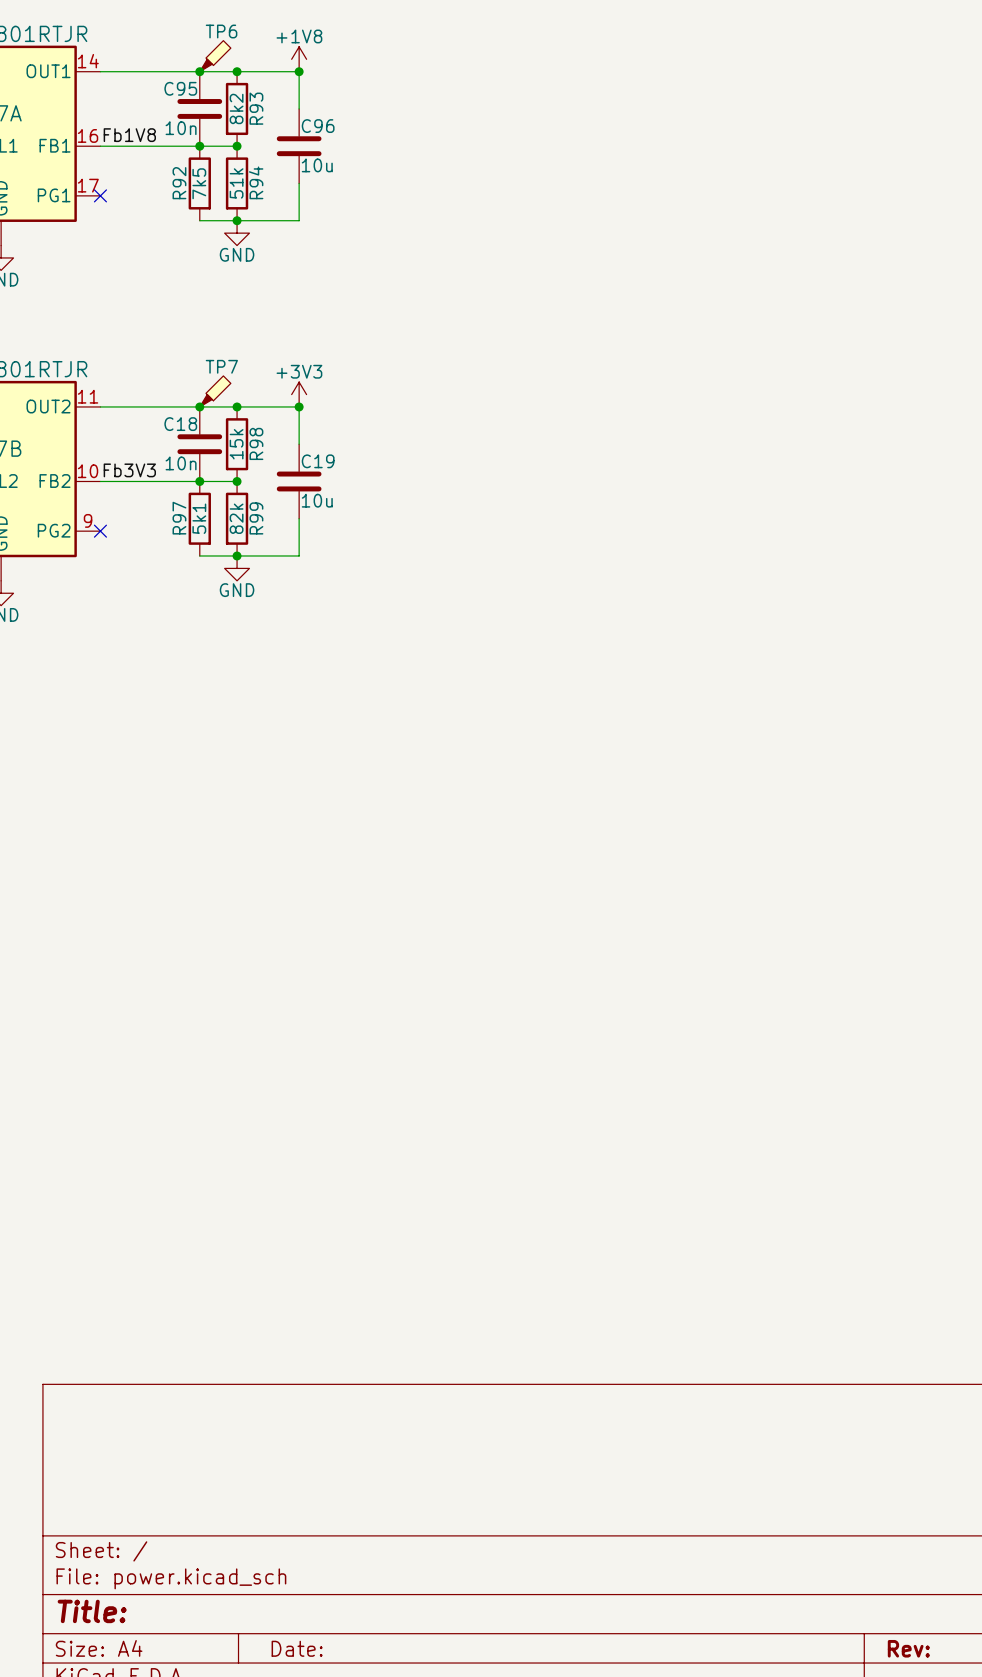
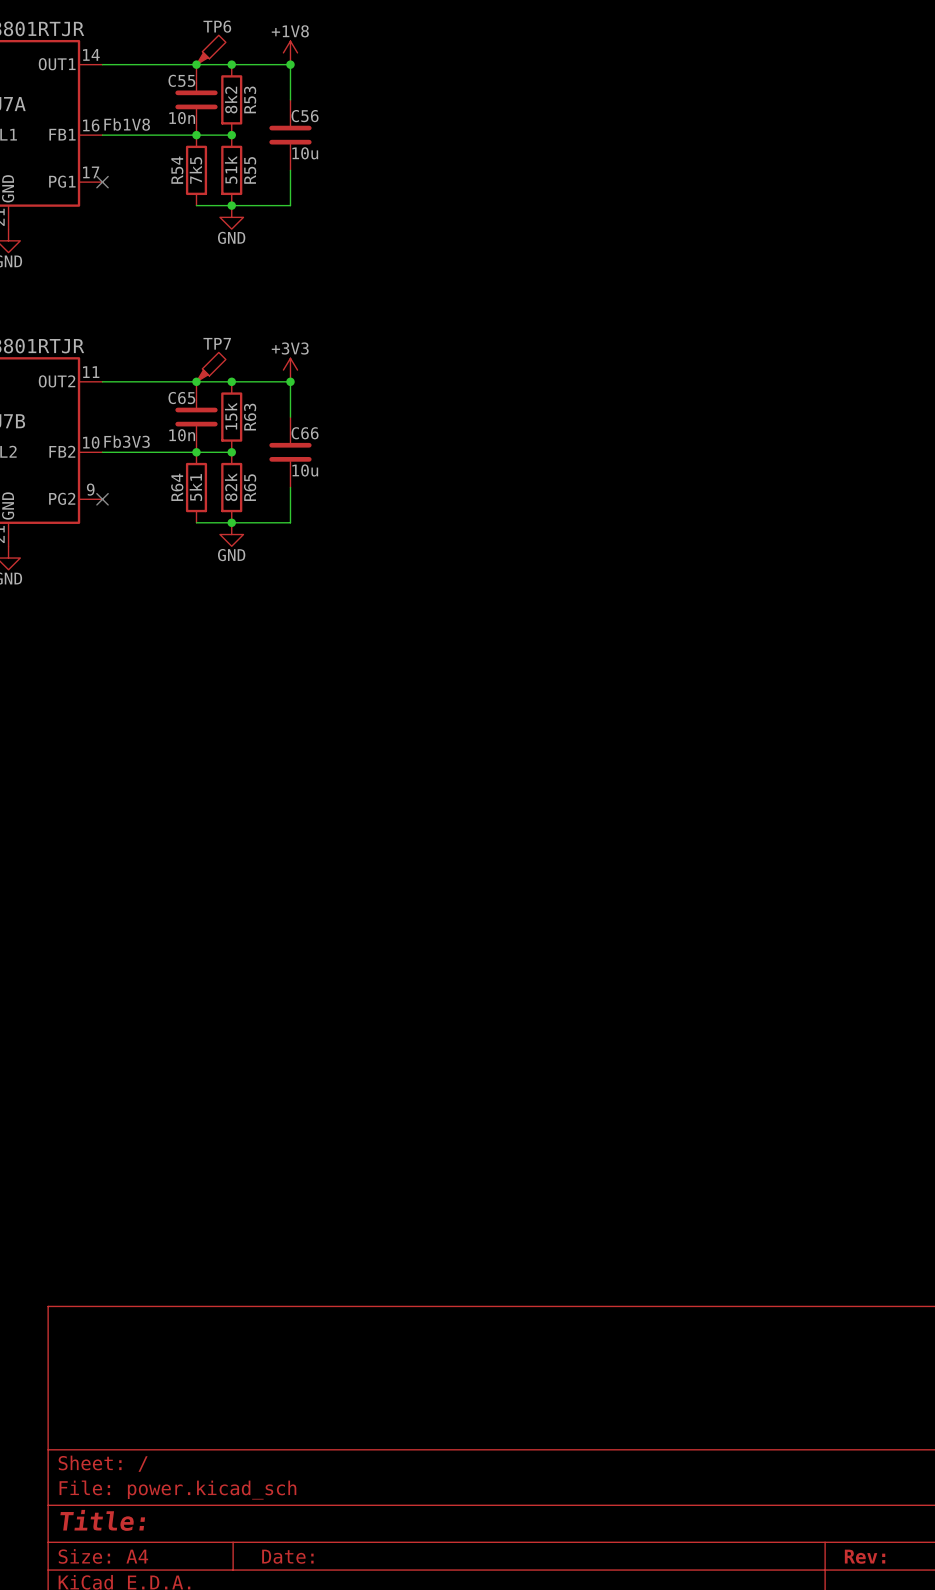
C95 name: C95 (180, 88) -> C55 (181, 80)
R93 name: R93 (256, 108) -> R53 (250, 99)
C96 name: C96 (318, 126) -> C56 (305, 116)
R94 name: R94 (256, 182) -> R55 (250, 170)
R92 name: R92 (179, 183) -> R54 (177, 170)
C18 name: C18 (180, 424) -> C65 (181, 398)
R98 name: R98 (256, 443) -> R63 (250, 417)
C19 name: C19 (318, 461) -> C66 (305, 433)
R97 name: R97 (179, 518) -> R64 (177, 487)
R99 name: R99 (256, 518) -> R65 (250, 487)

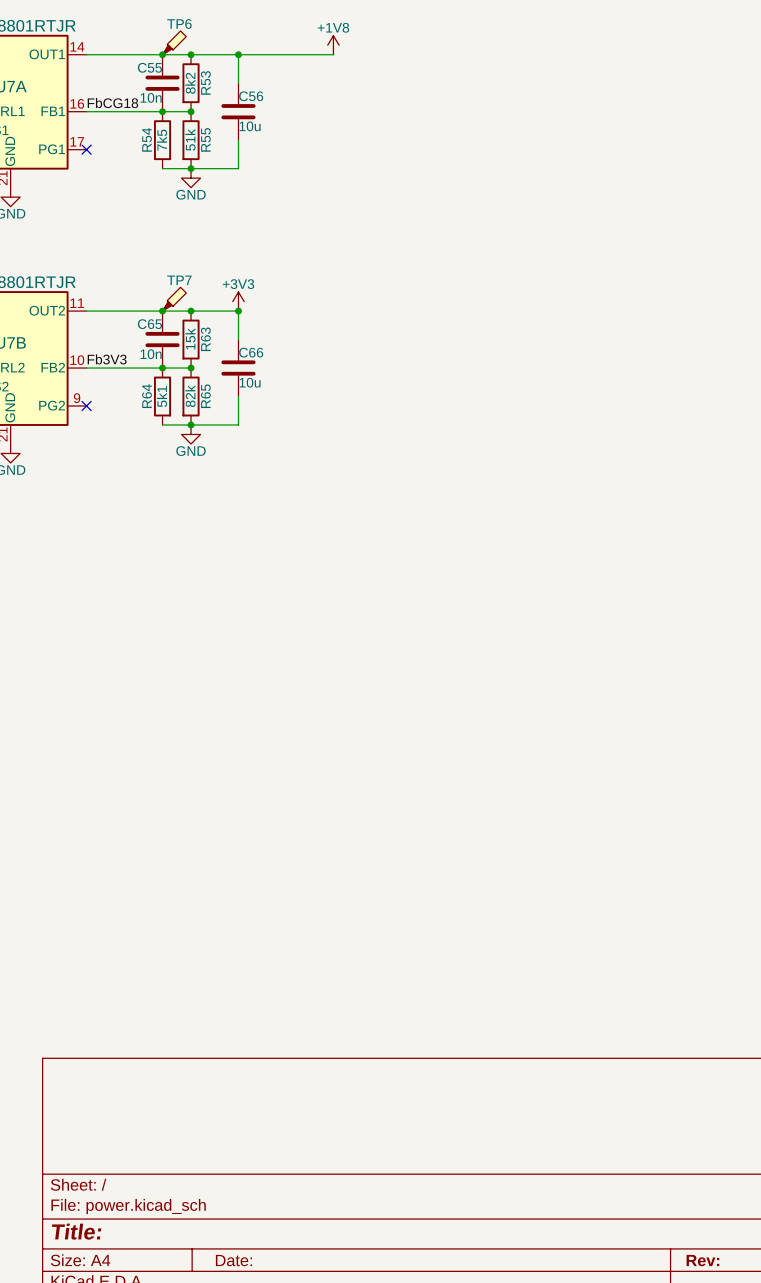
power symbol position: +1V8 (290, 52) -> +1V8 (333, 45)
wire: none -> (238, 54) (333, 54)
label: Fb1V8 (127, 124) -> FbCG18 (112, 103)

